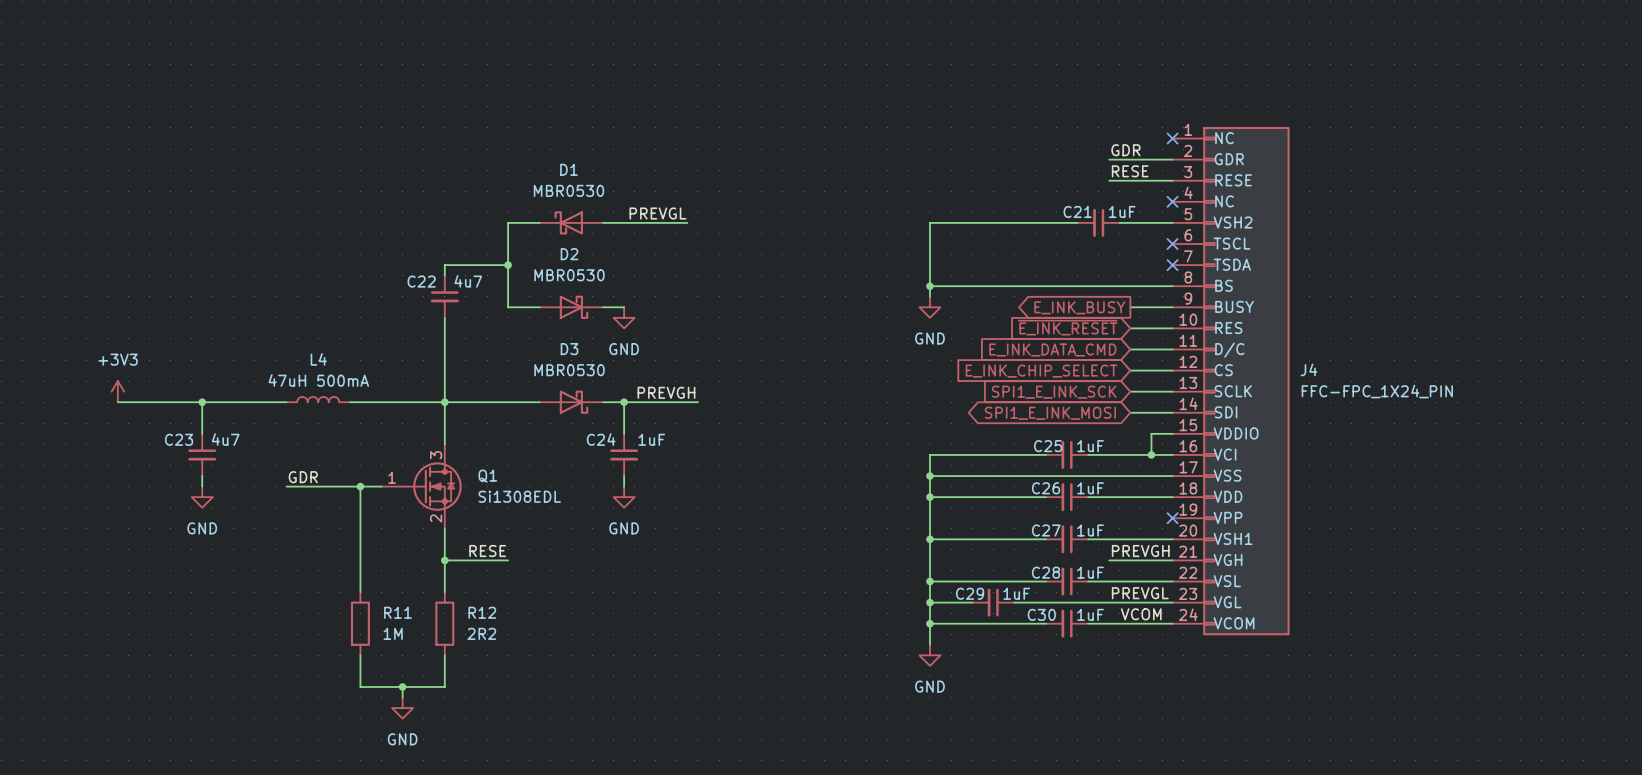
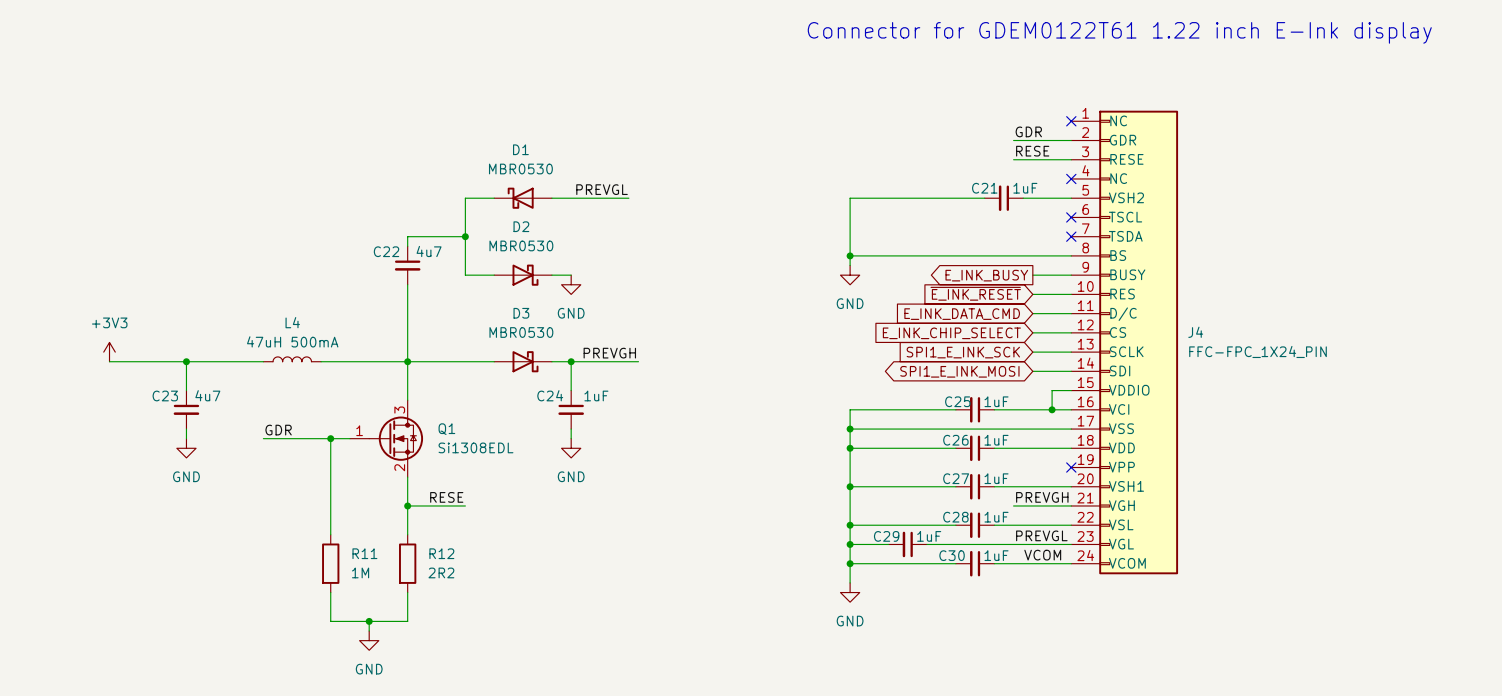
text: none -> Connector for GDEM0122T61 1.22 inch E-Ink display (1119, 32)

